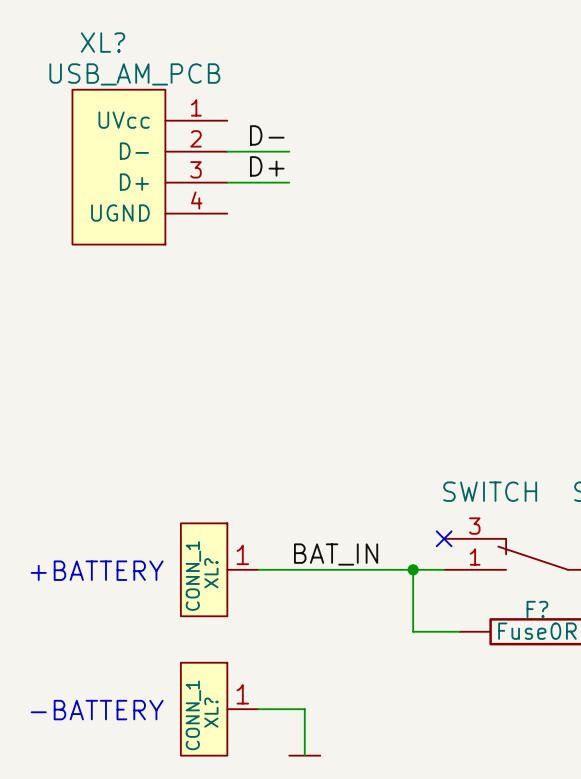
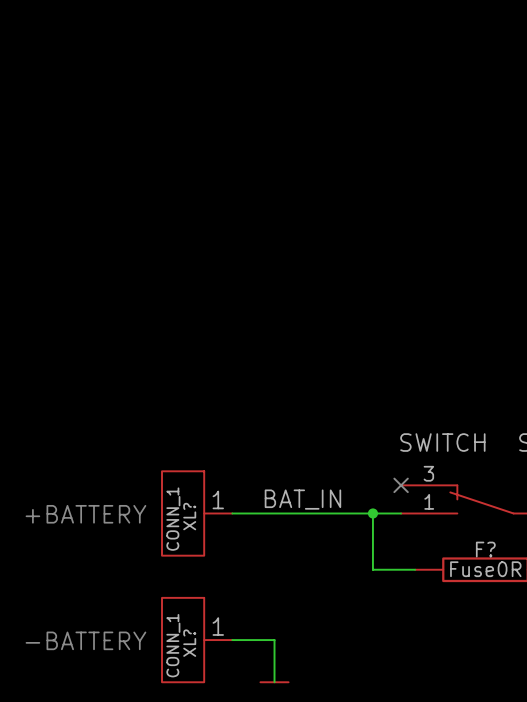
label: D- (267, 135) -> none
wire: (227, 151) (289, 151) -> none
label: D+ (267, 166) -> none
XL?: USB_AM_PCB (149, 167) -> none
wire: (227, 182) (289, 182) -> none

